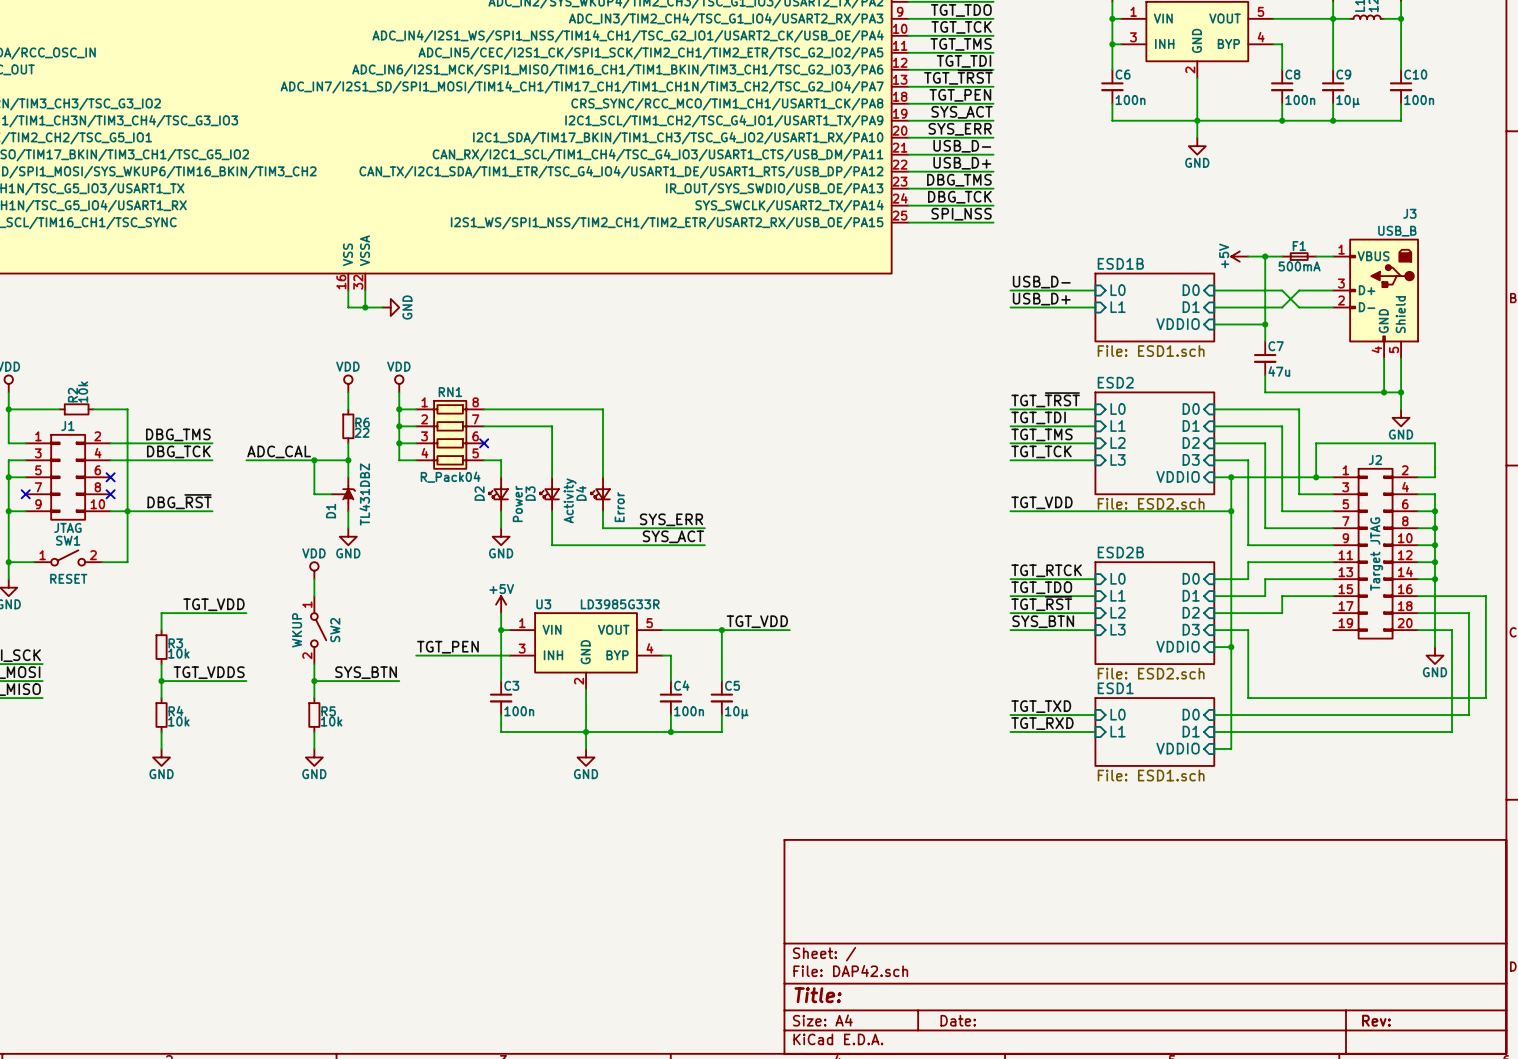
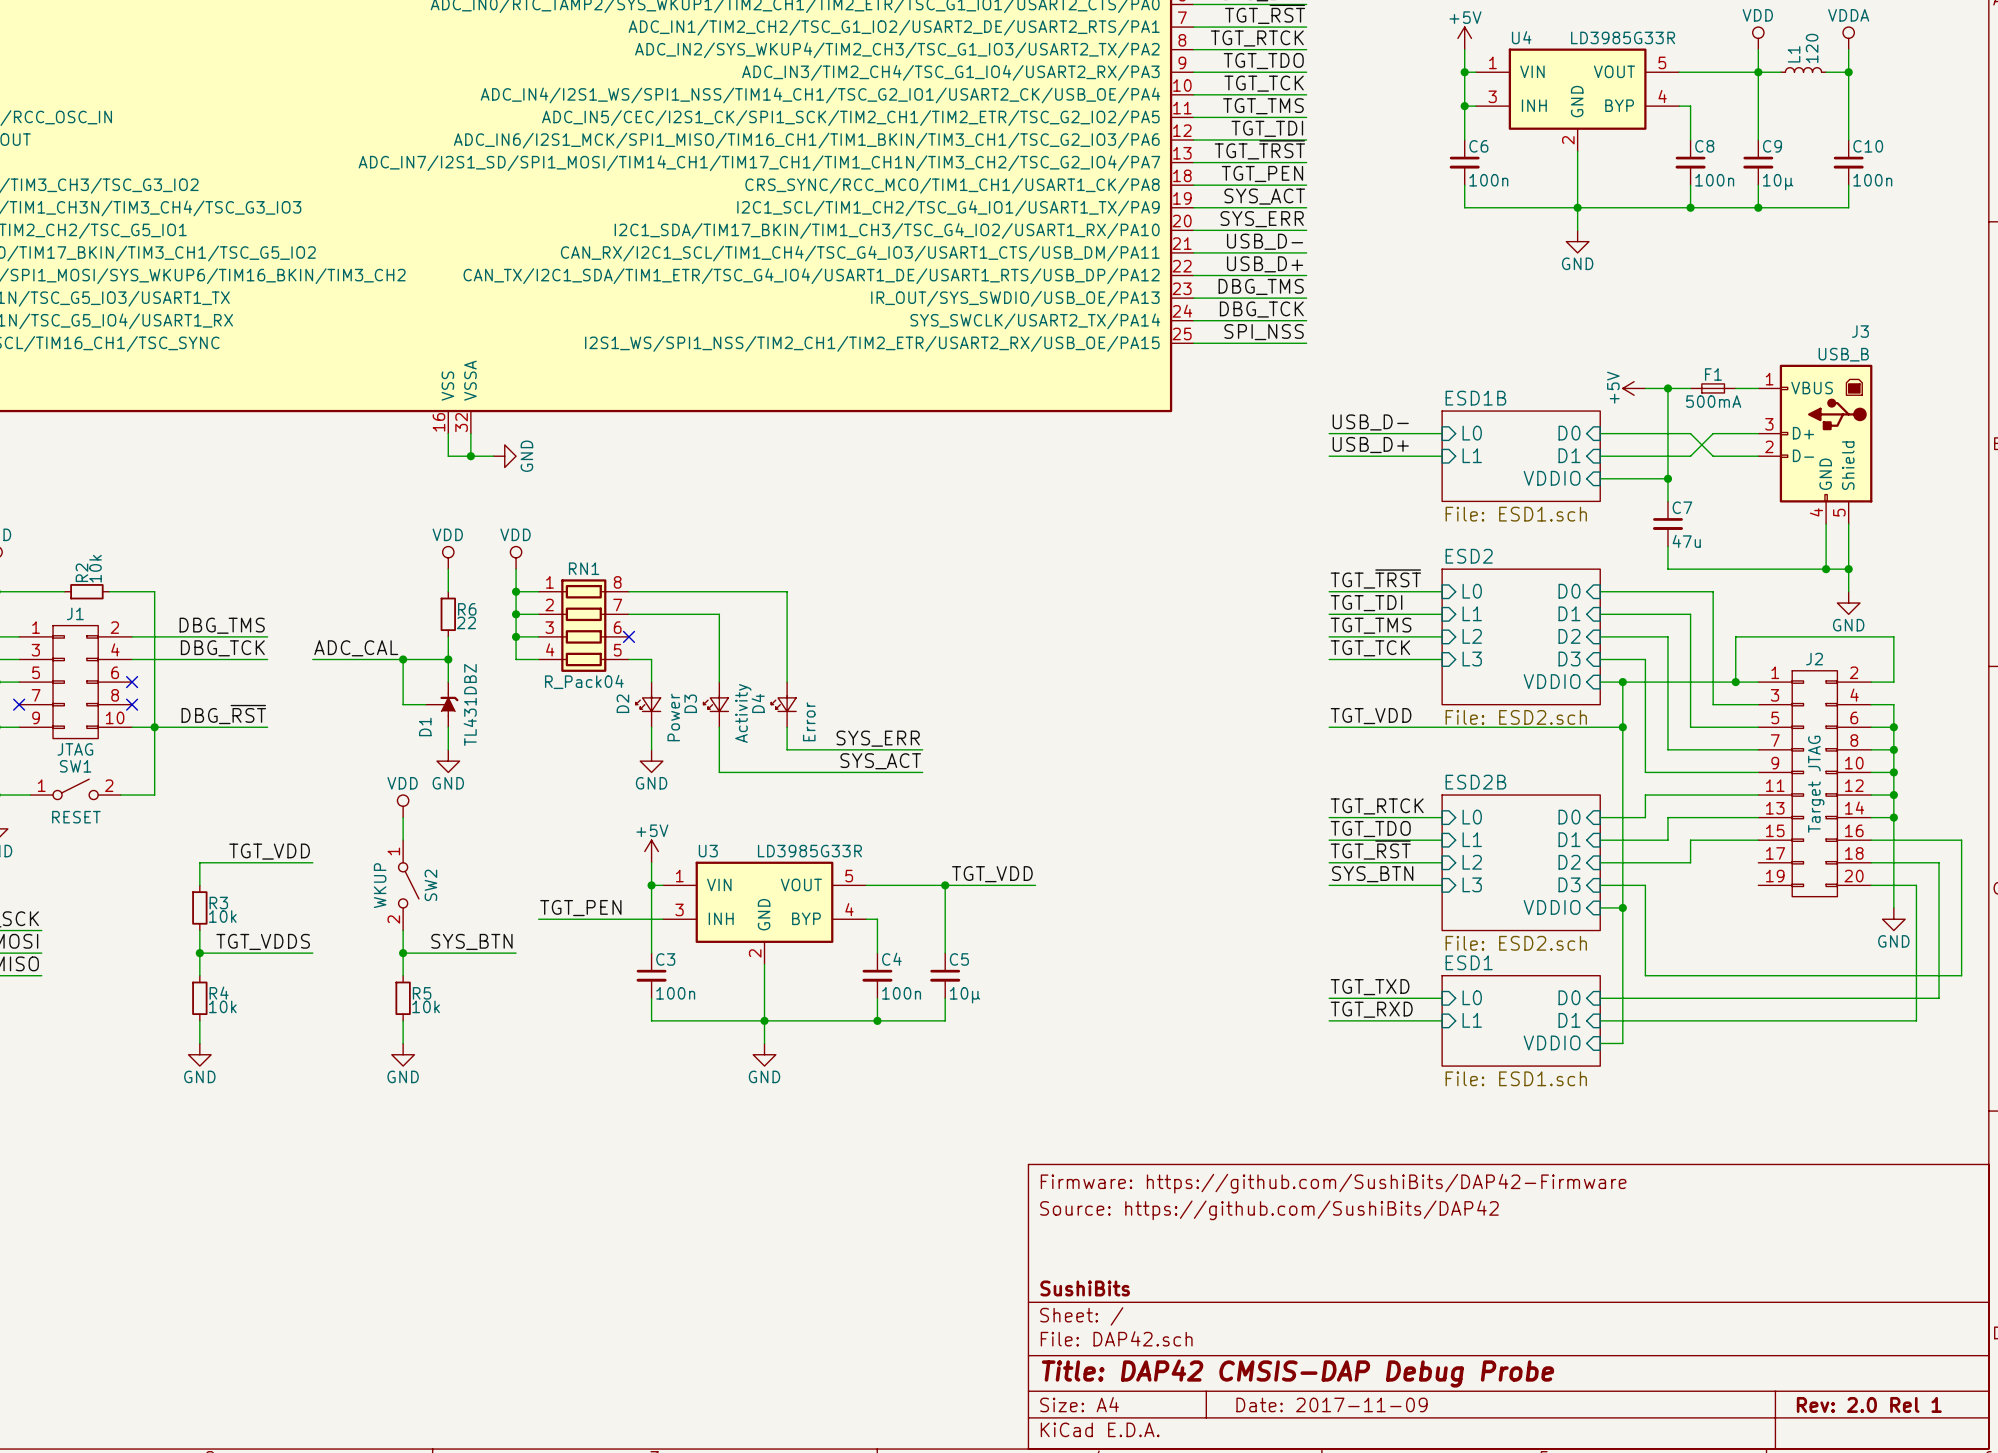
title block: none -> Firmware: https://github.com/SushiBits/DAP42-Firmware (1333, 1183)
title block: none -> Source: https://github.com/SushiBits/DAP42 (1269, 1210)
title block: none -> SushiBits (1085, 1288)
title block: Title: (818, 995) -> Title: DAP42 CMSIS-DAP Debug Probe (1297, 1373)
title block: Date: (958, 1020) -> Date: 2017-11-09 (1332, 1404)
title block: Rev: (1376, 1020) -> Rev: 2.0 Rel 1 (1869, 1404)

